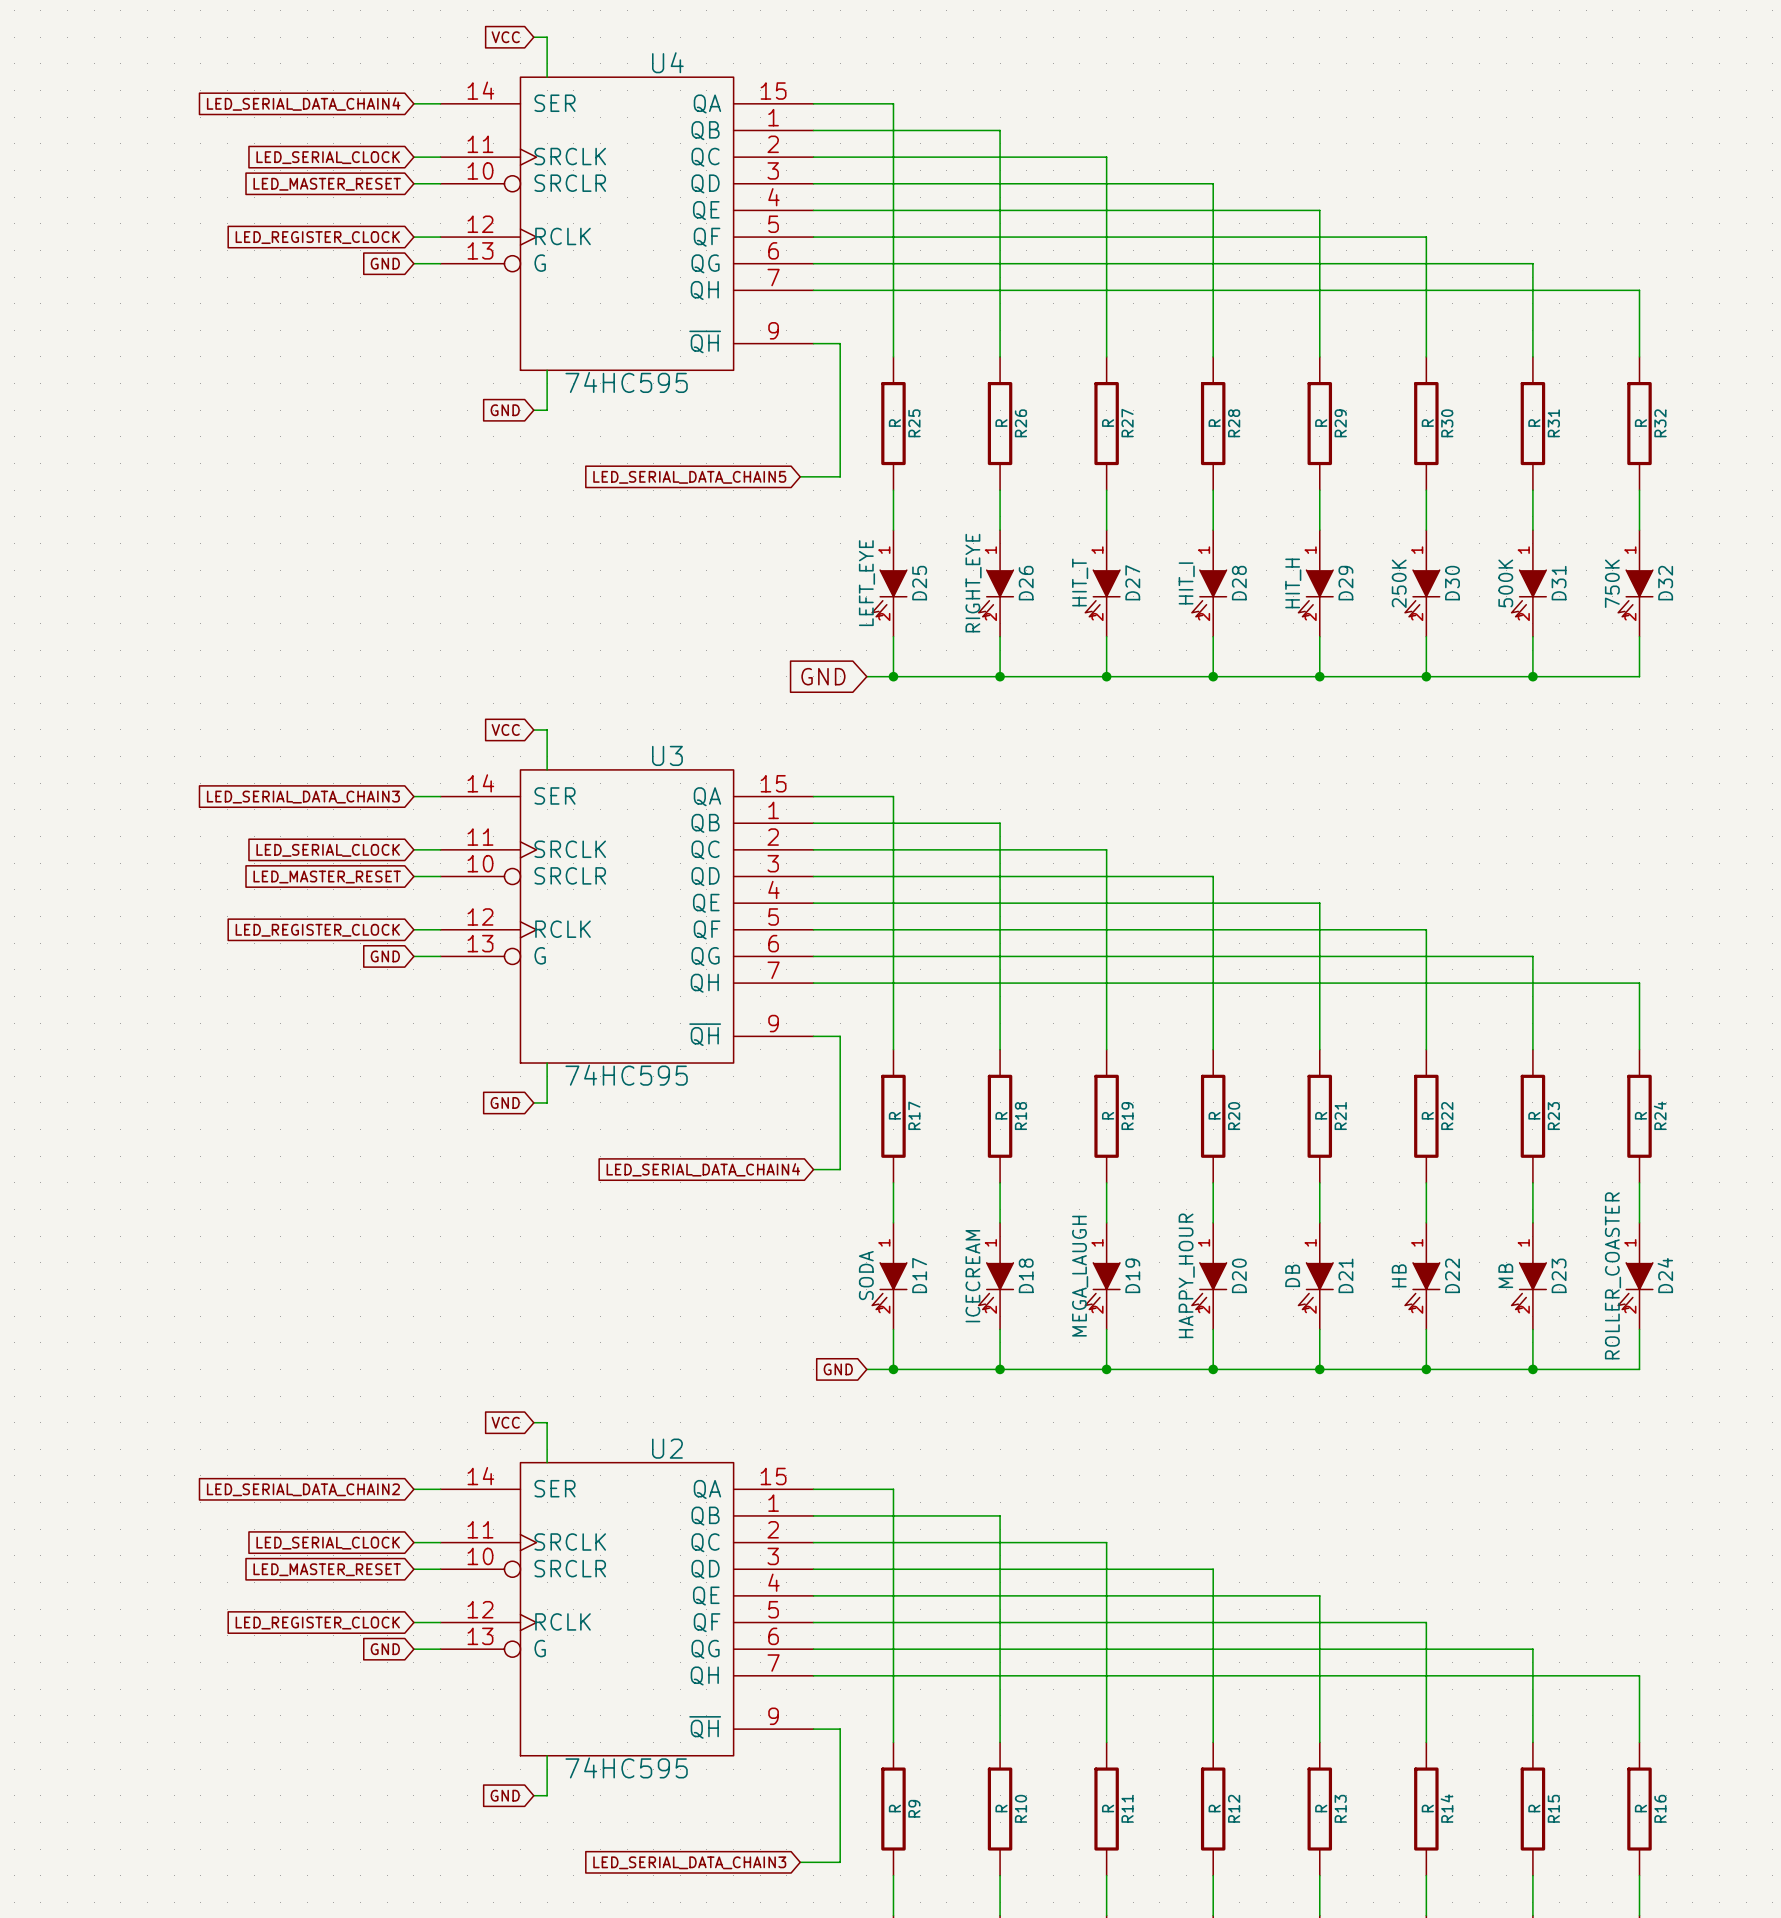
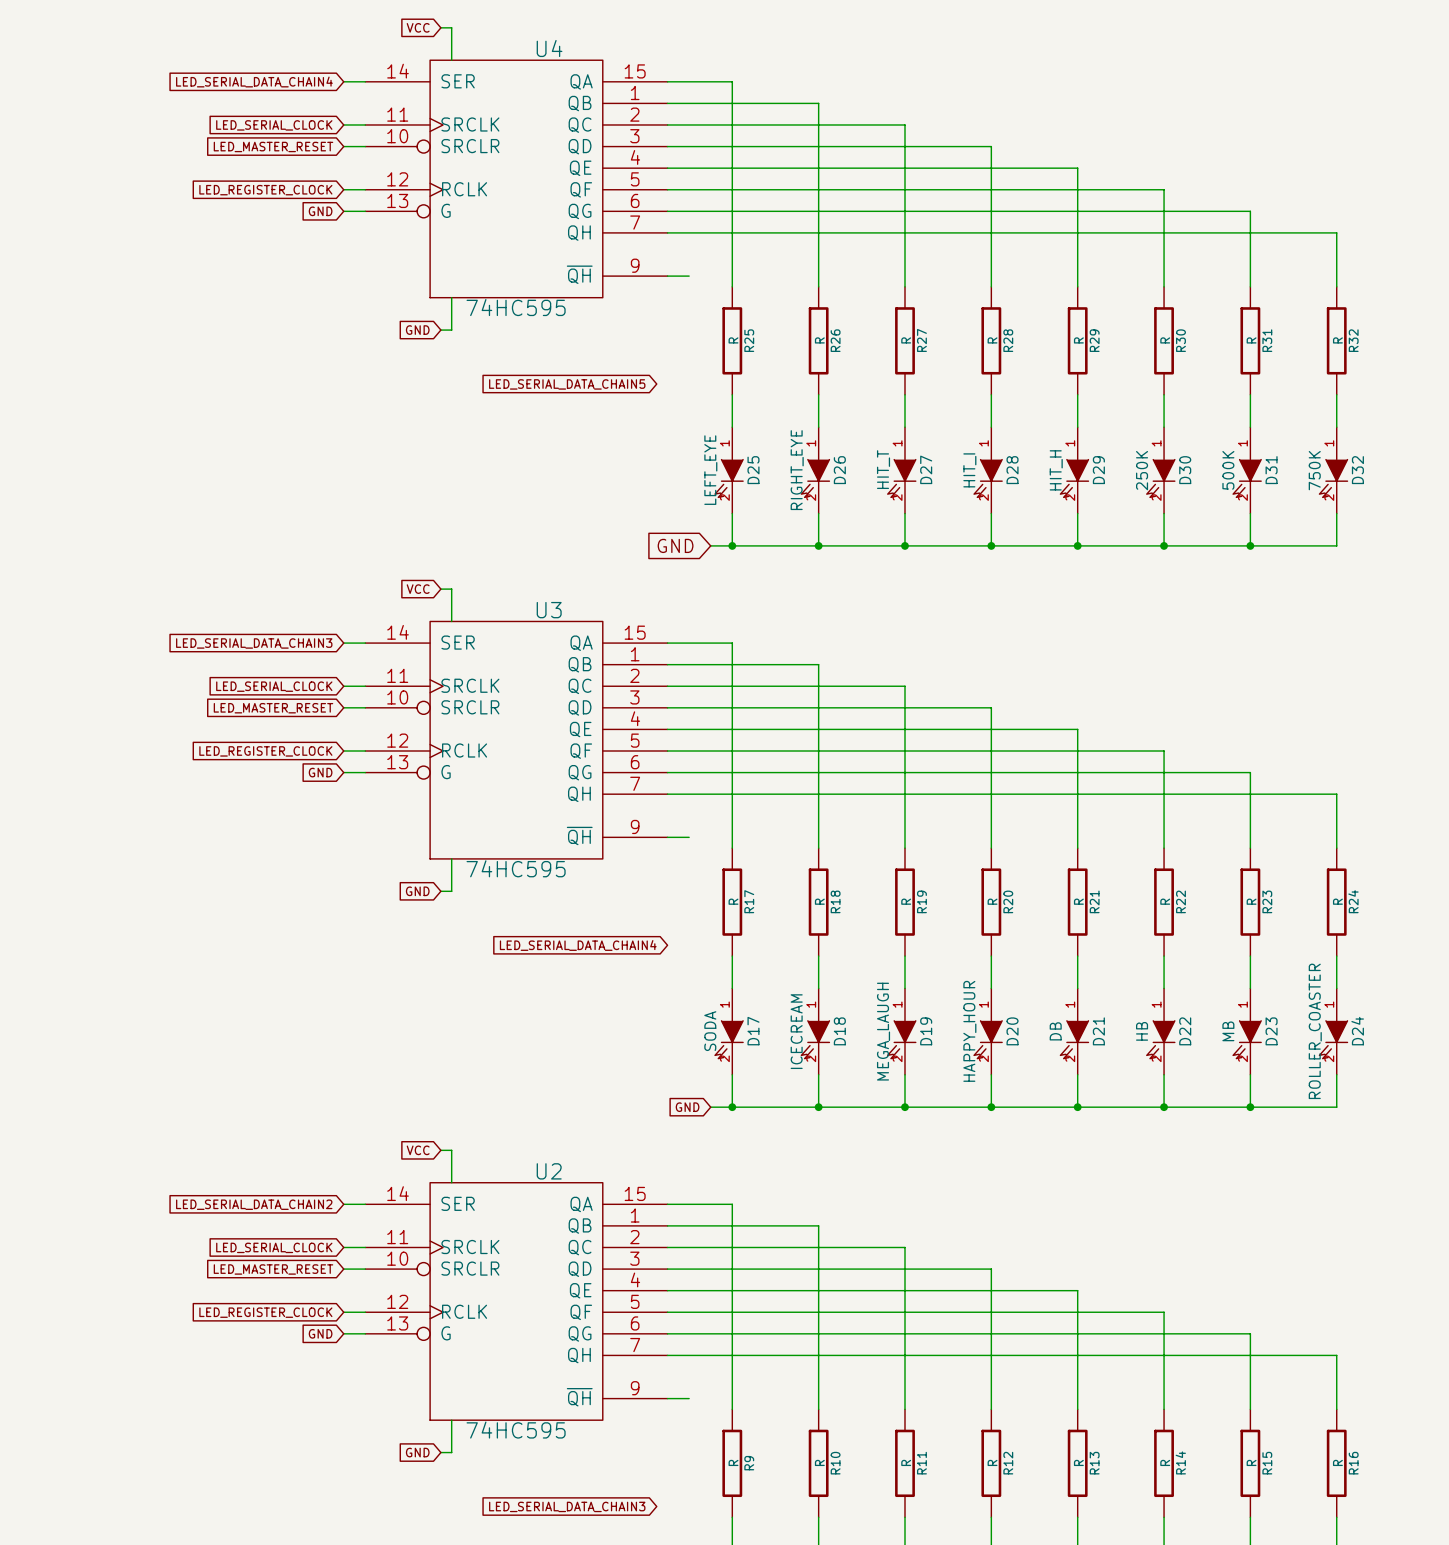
wire: (840, 343) (840, 476) (800, 476) -> none
wire: (840, 1036) (840, 1169) (813, 1169) -> none
wire: (840, 1729) (840, 1862) (800, 1862) -> none

